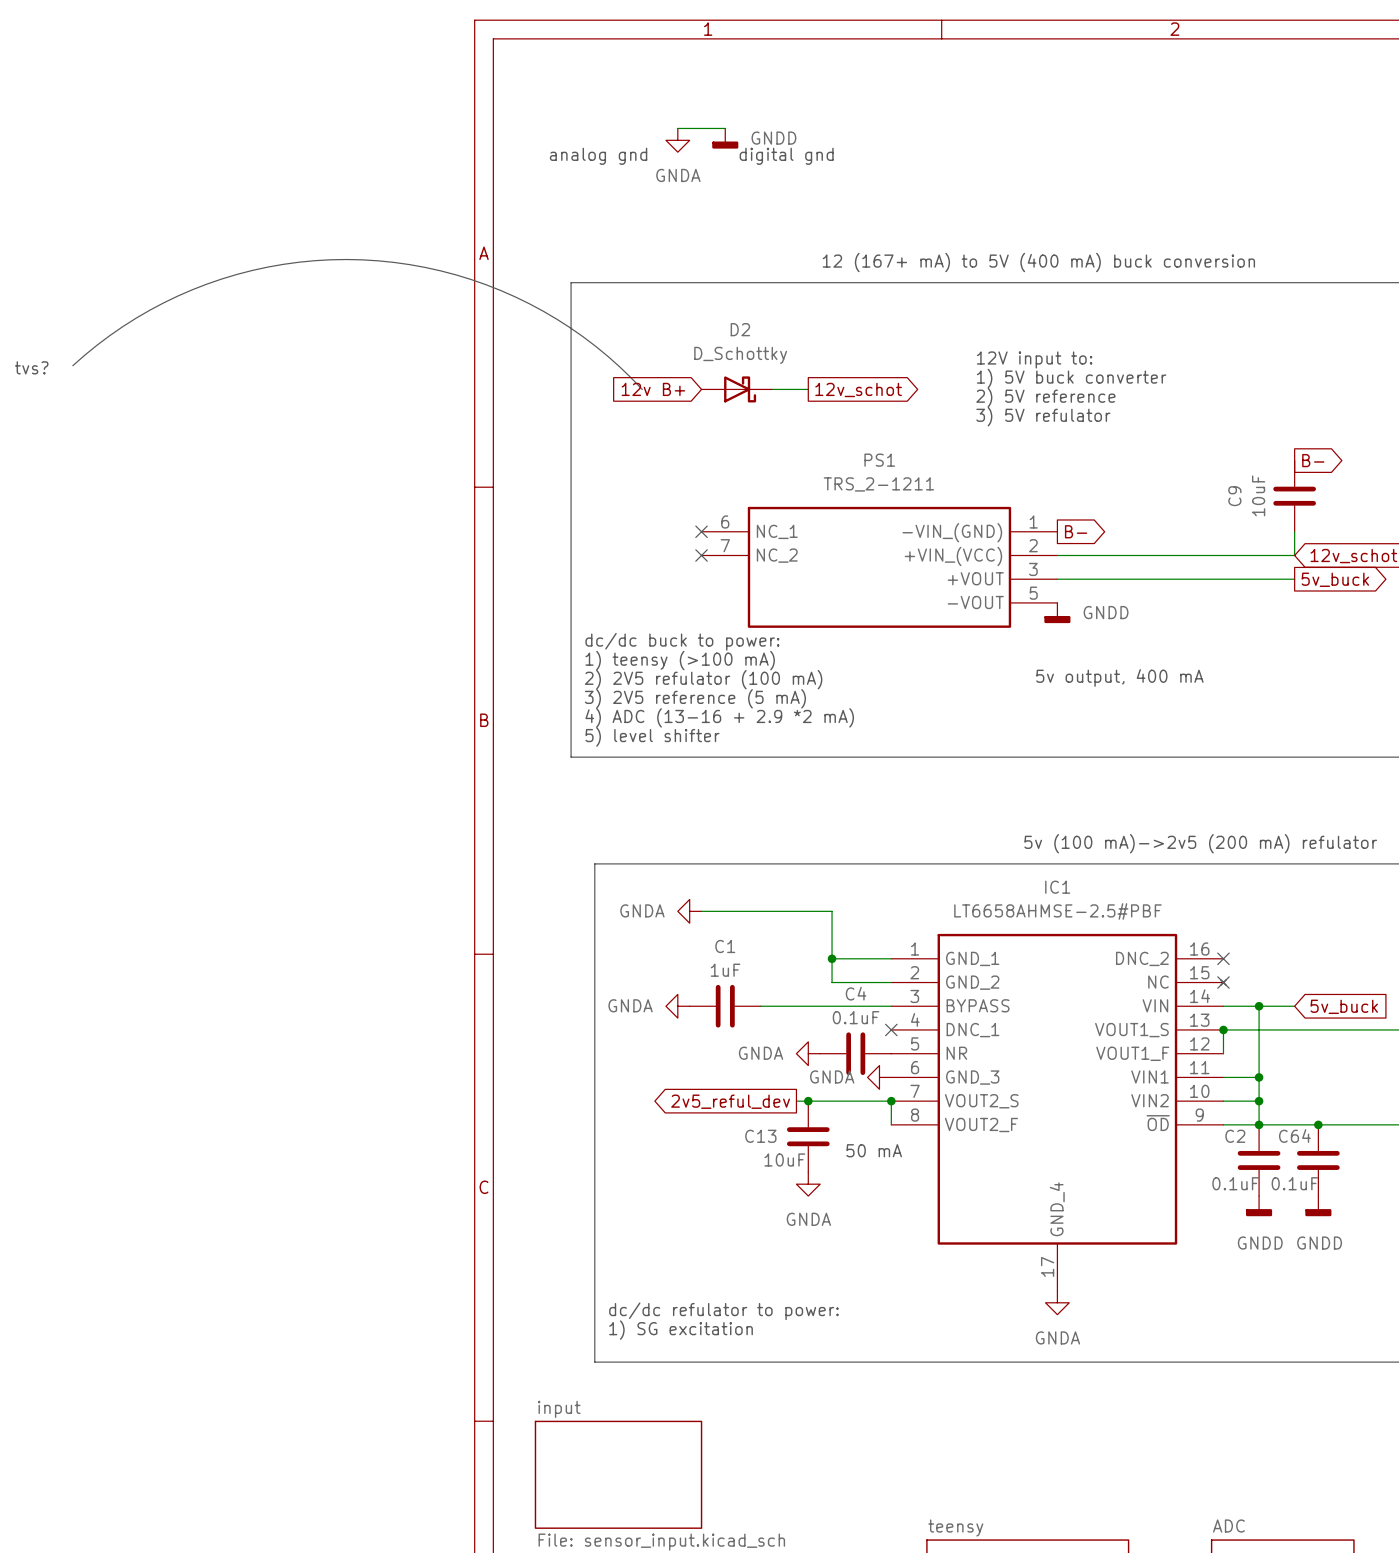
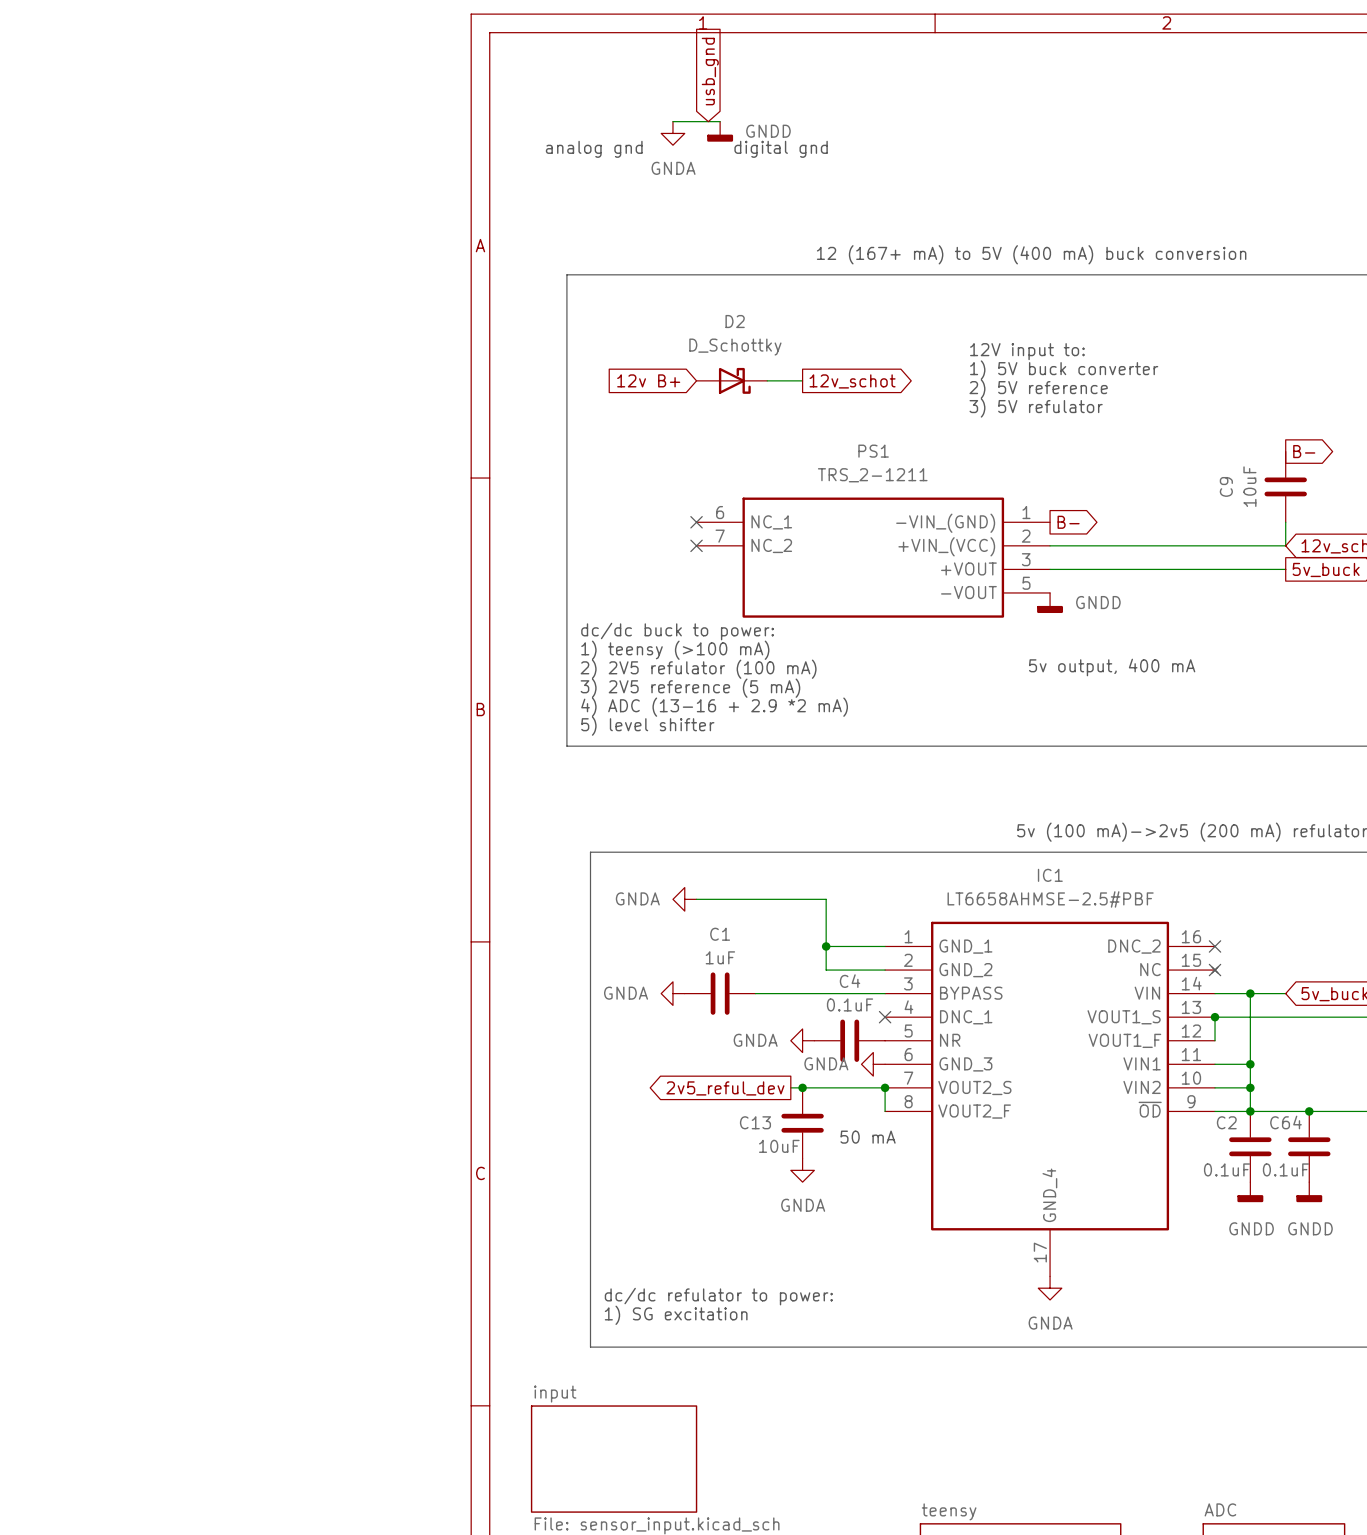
global label: none -> usb_gnd (710, 71)
line: (72, 365) (96, 345) (135, 318) (163, 302) (207, 284) (237, 274) (283, 264) (330, 259) (362, 259) (393, 262) (440, 270) (471, 279) (515, 296) (556, 319) (583, 336) (619, 367) (642, 389) -> none
text: tvs? (31, 367) -> none

